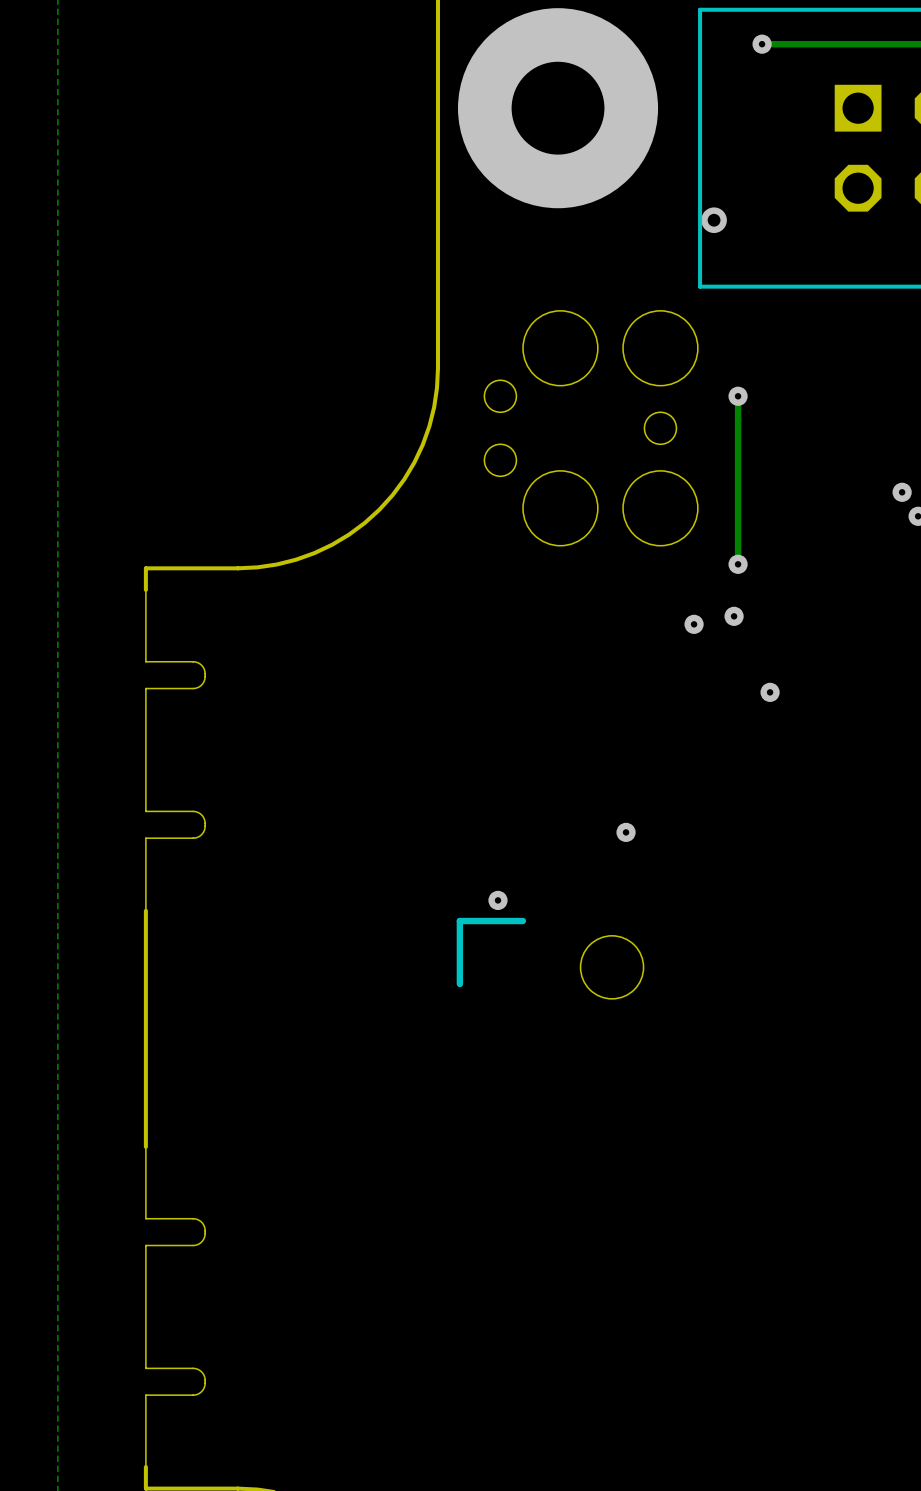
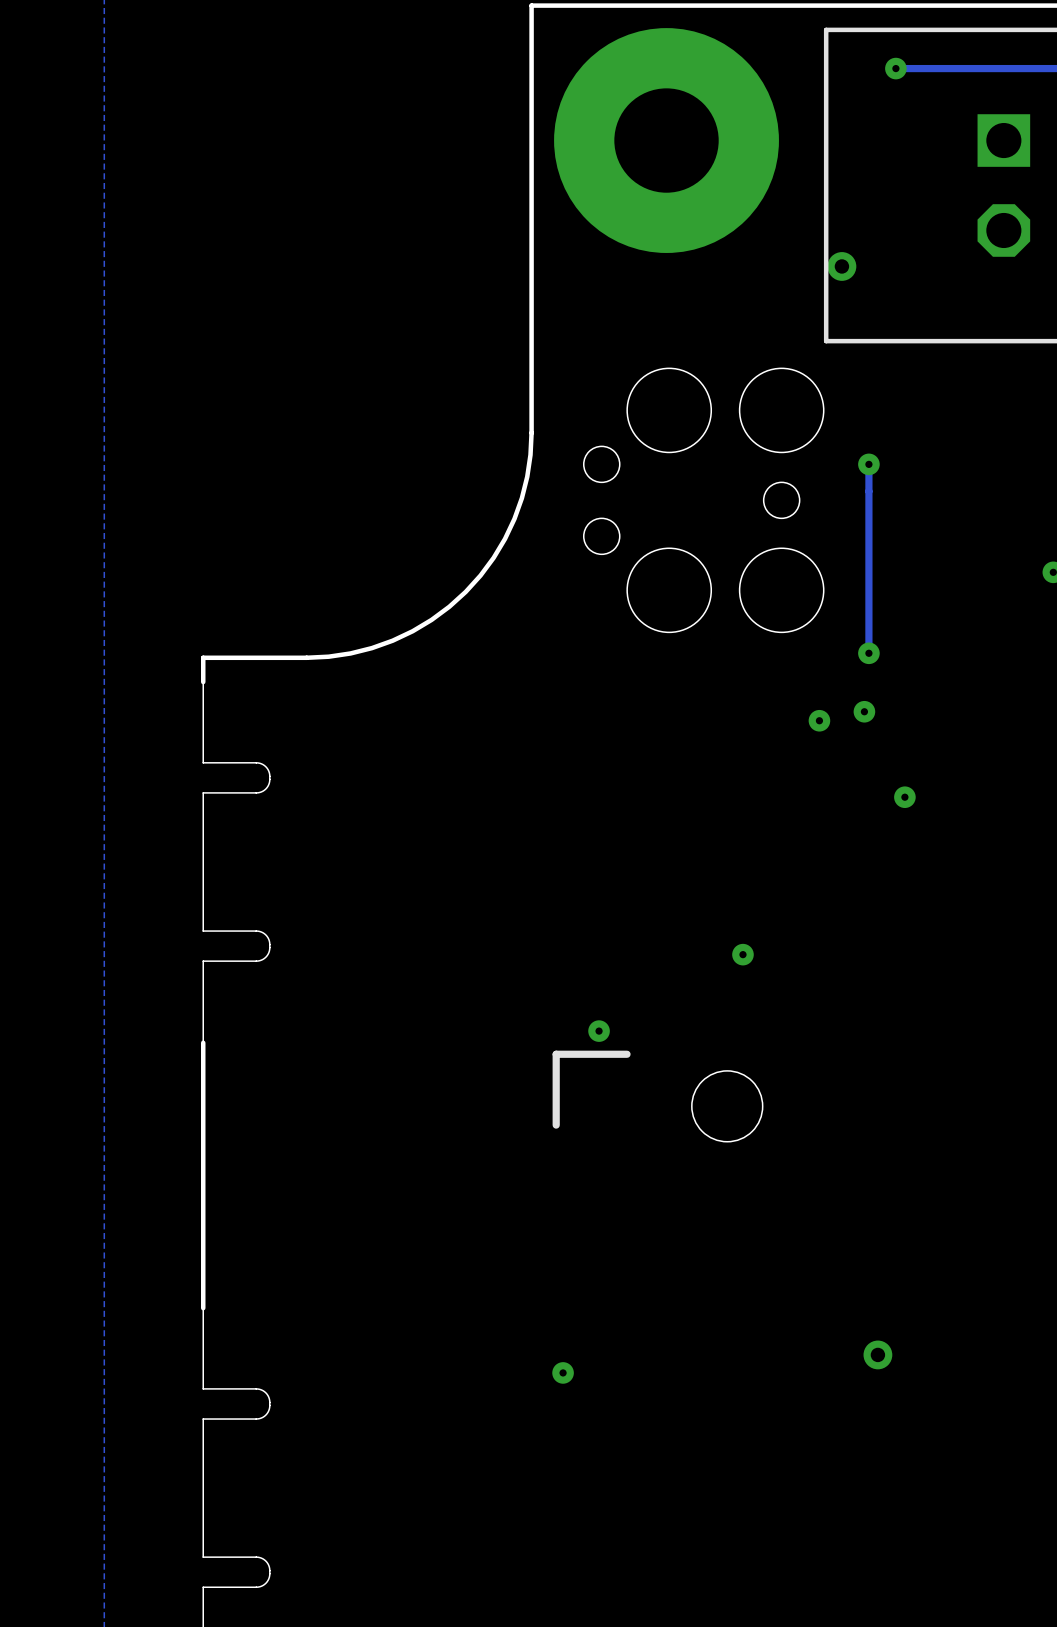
via: none -> (877, 1354)
via: none -> (563, 1372)

